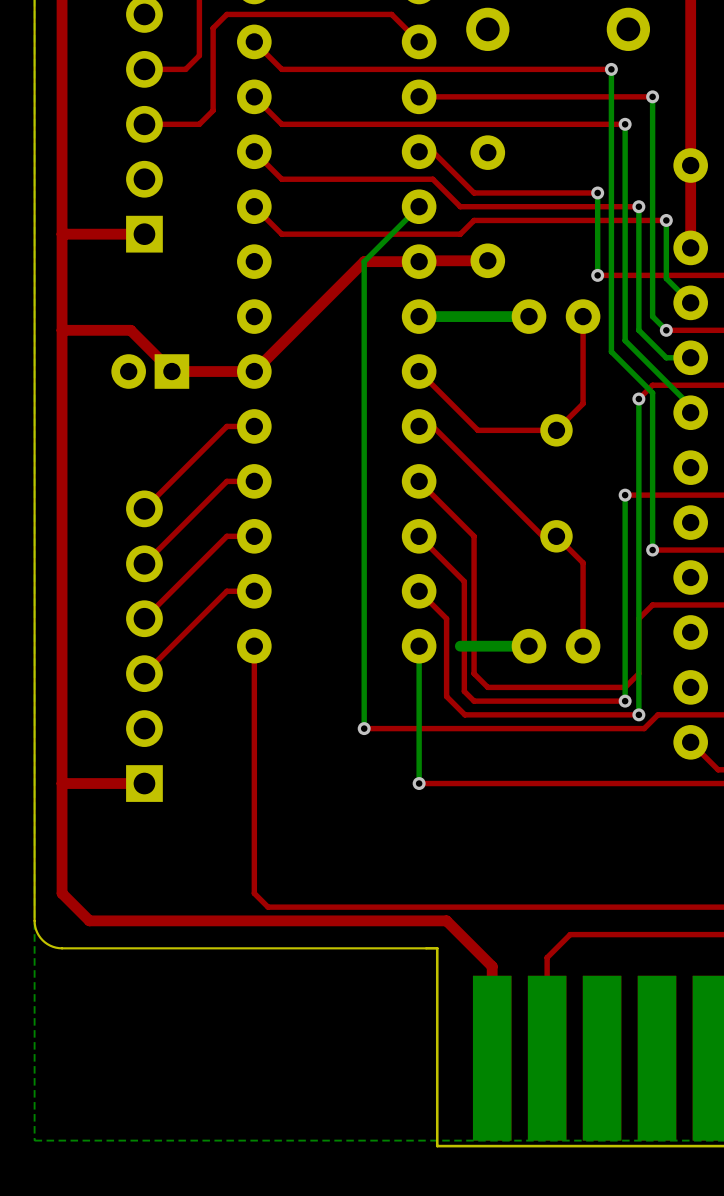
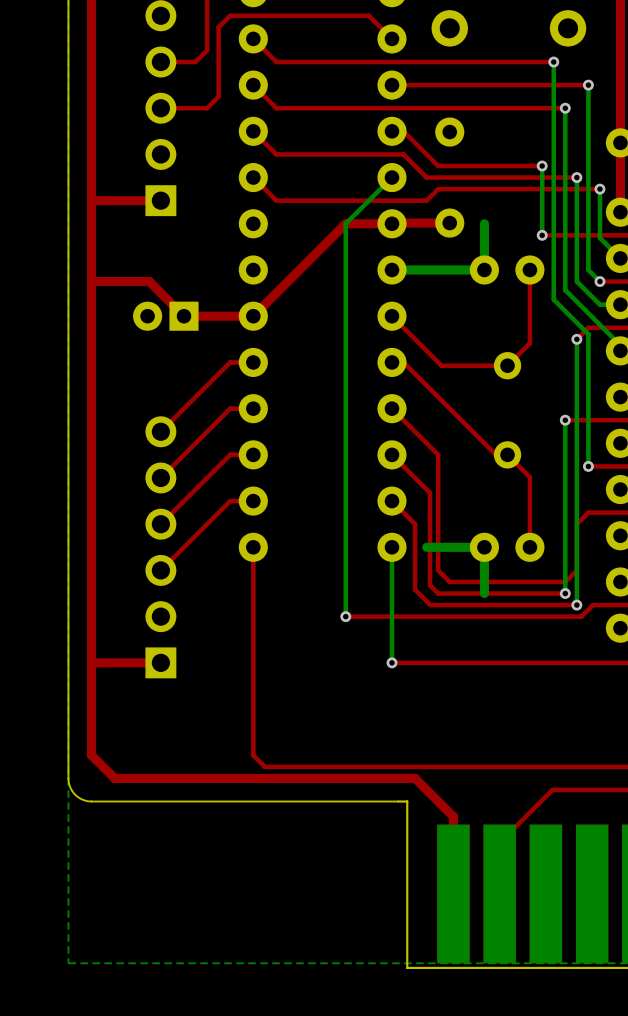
bottom track: none -> (484, 223) (484, 269)
bottom track: none -> (484, 547) (484, 593)
top track: (609, 934) (570, 934) (547, 957) (547, 1058) -> (552, 789) (499, 842)

